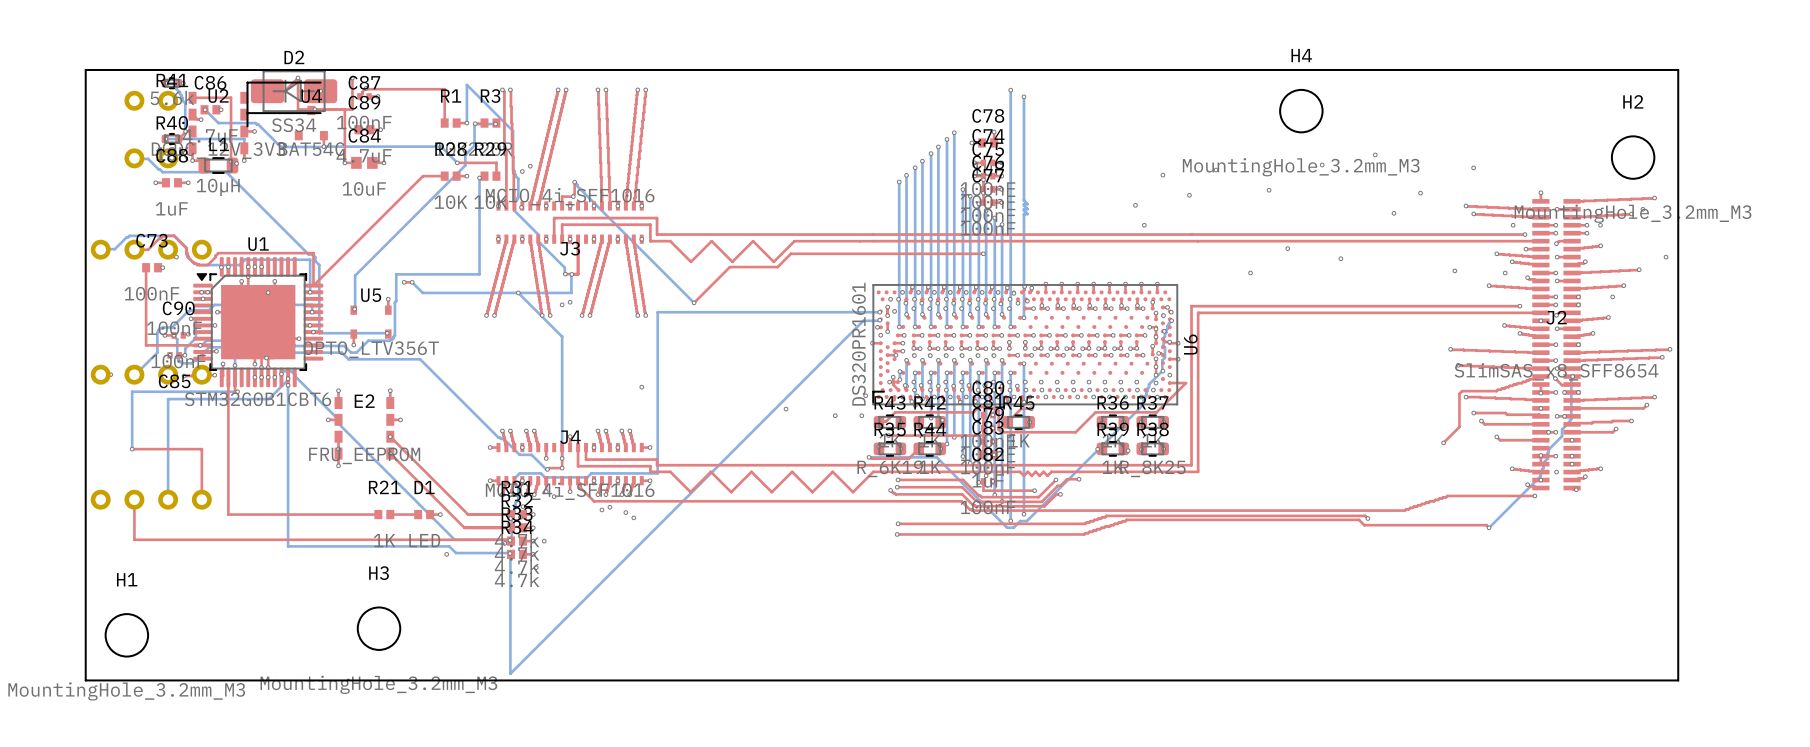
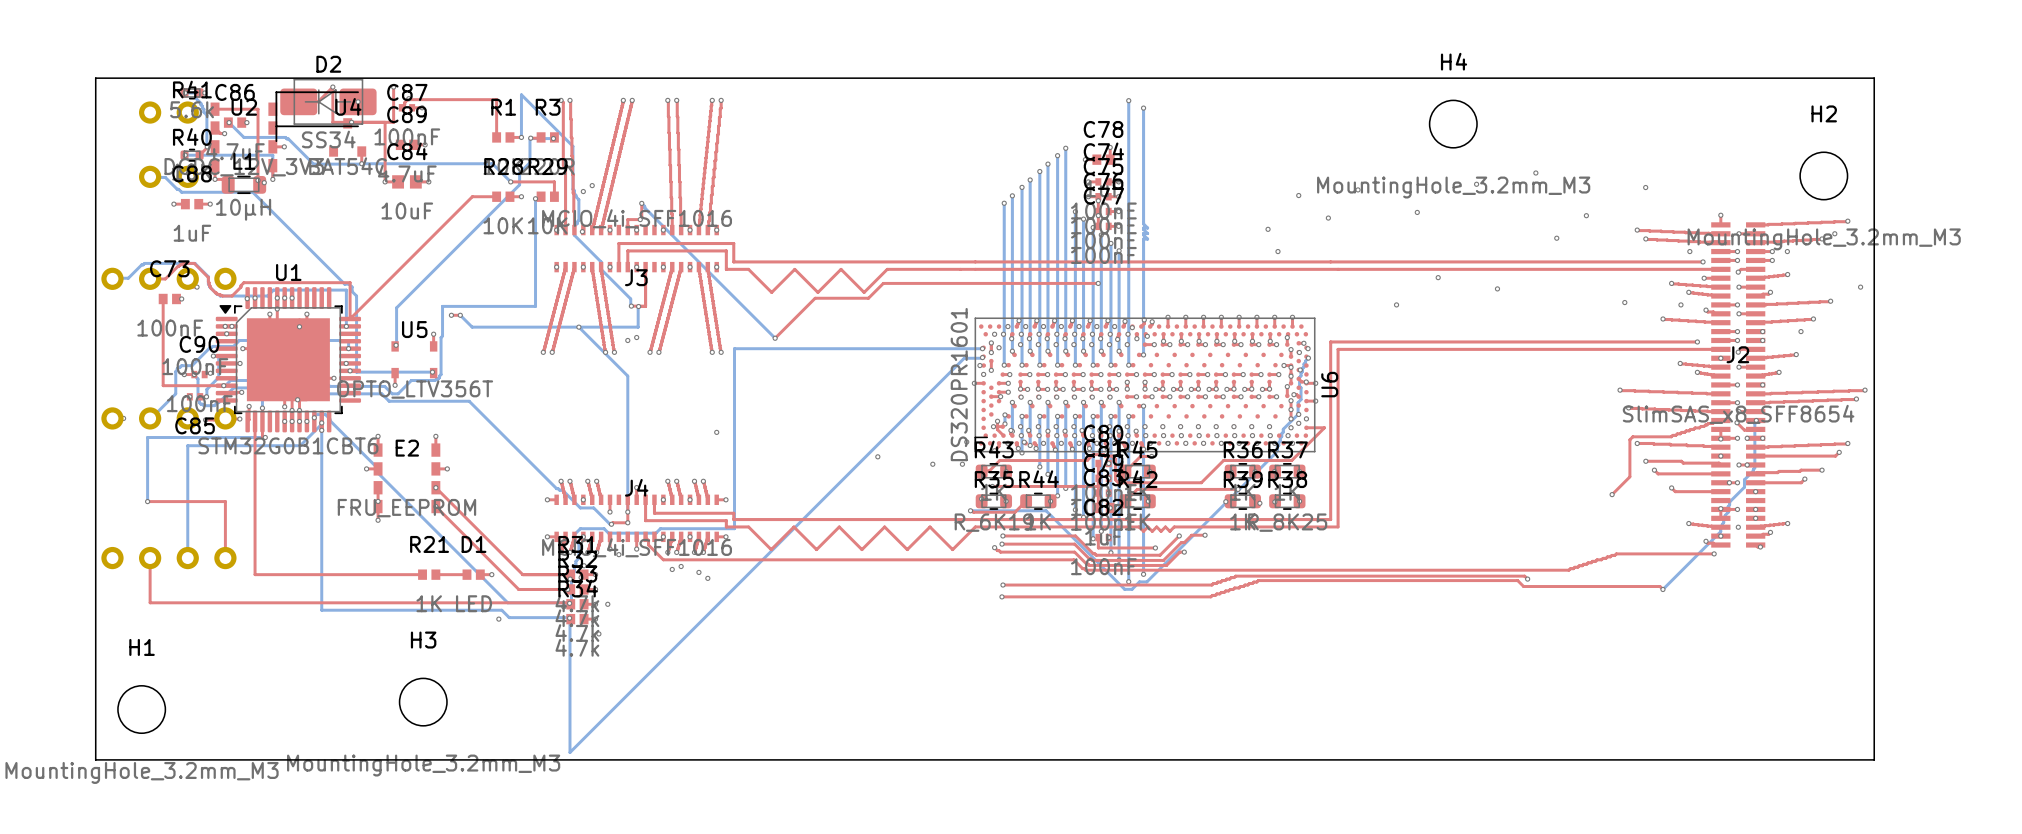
via: none -> (1298, 423)
via: (942, 420) -> none
R42 position: (929, 422) -> (1137, 501)
top track: none -> (1238, 489) (1137, 489) (1125, 501)
via: none -> (1238, 489)
via: none -> (1148, 501)

